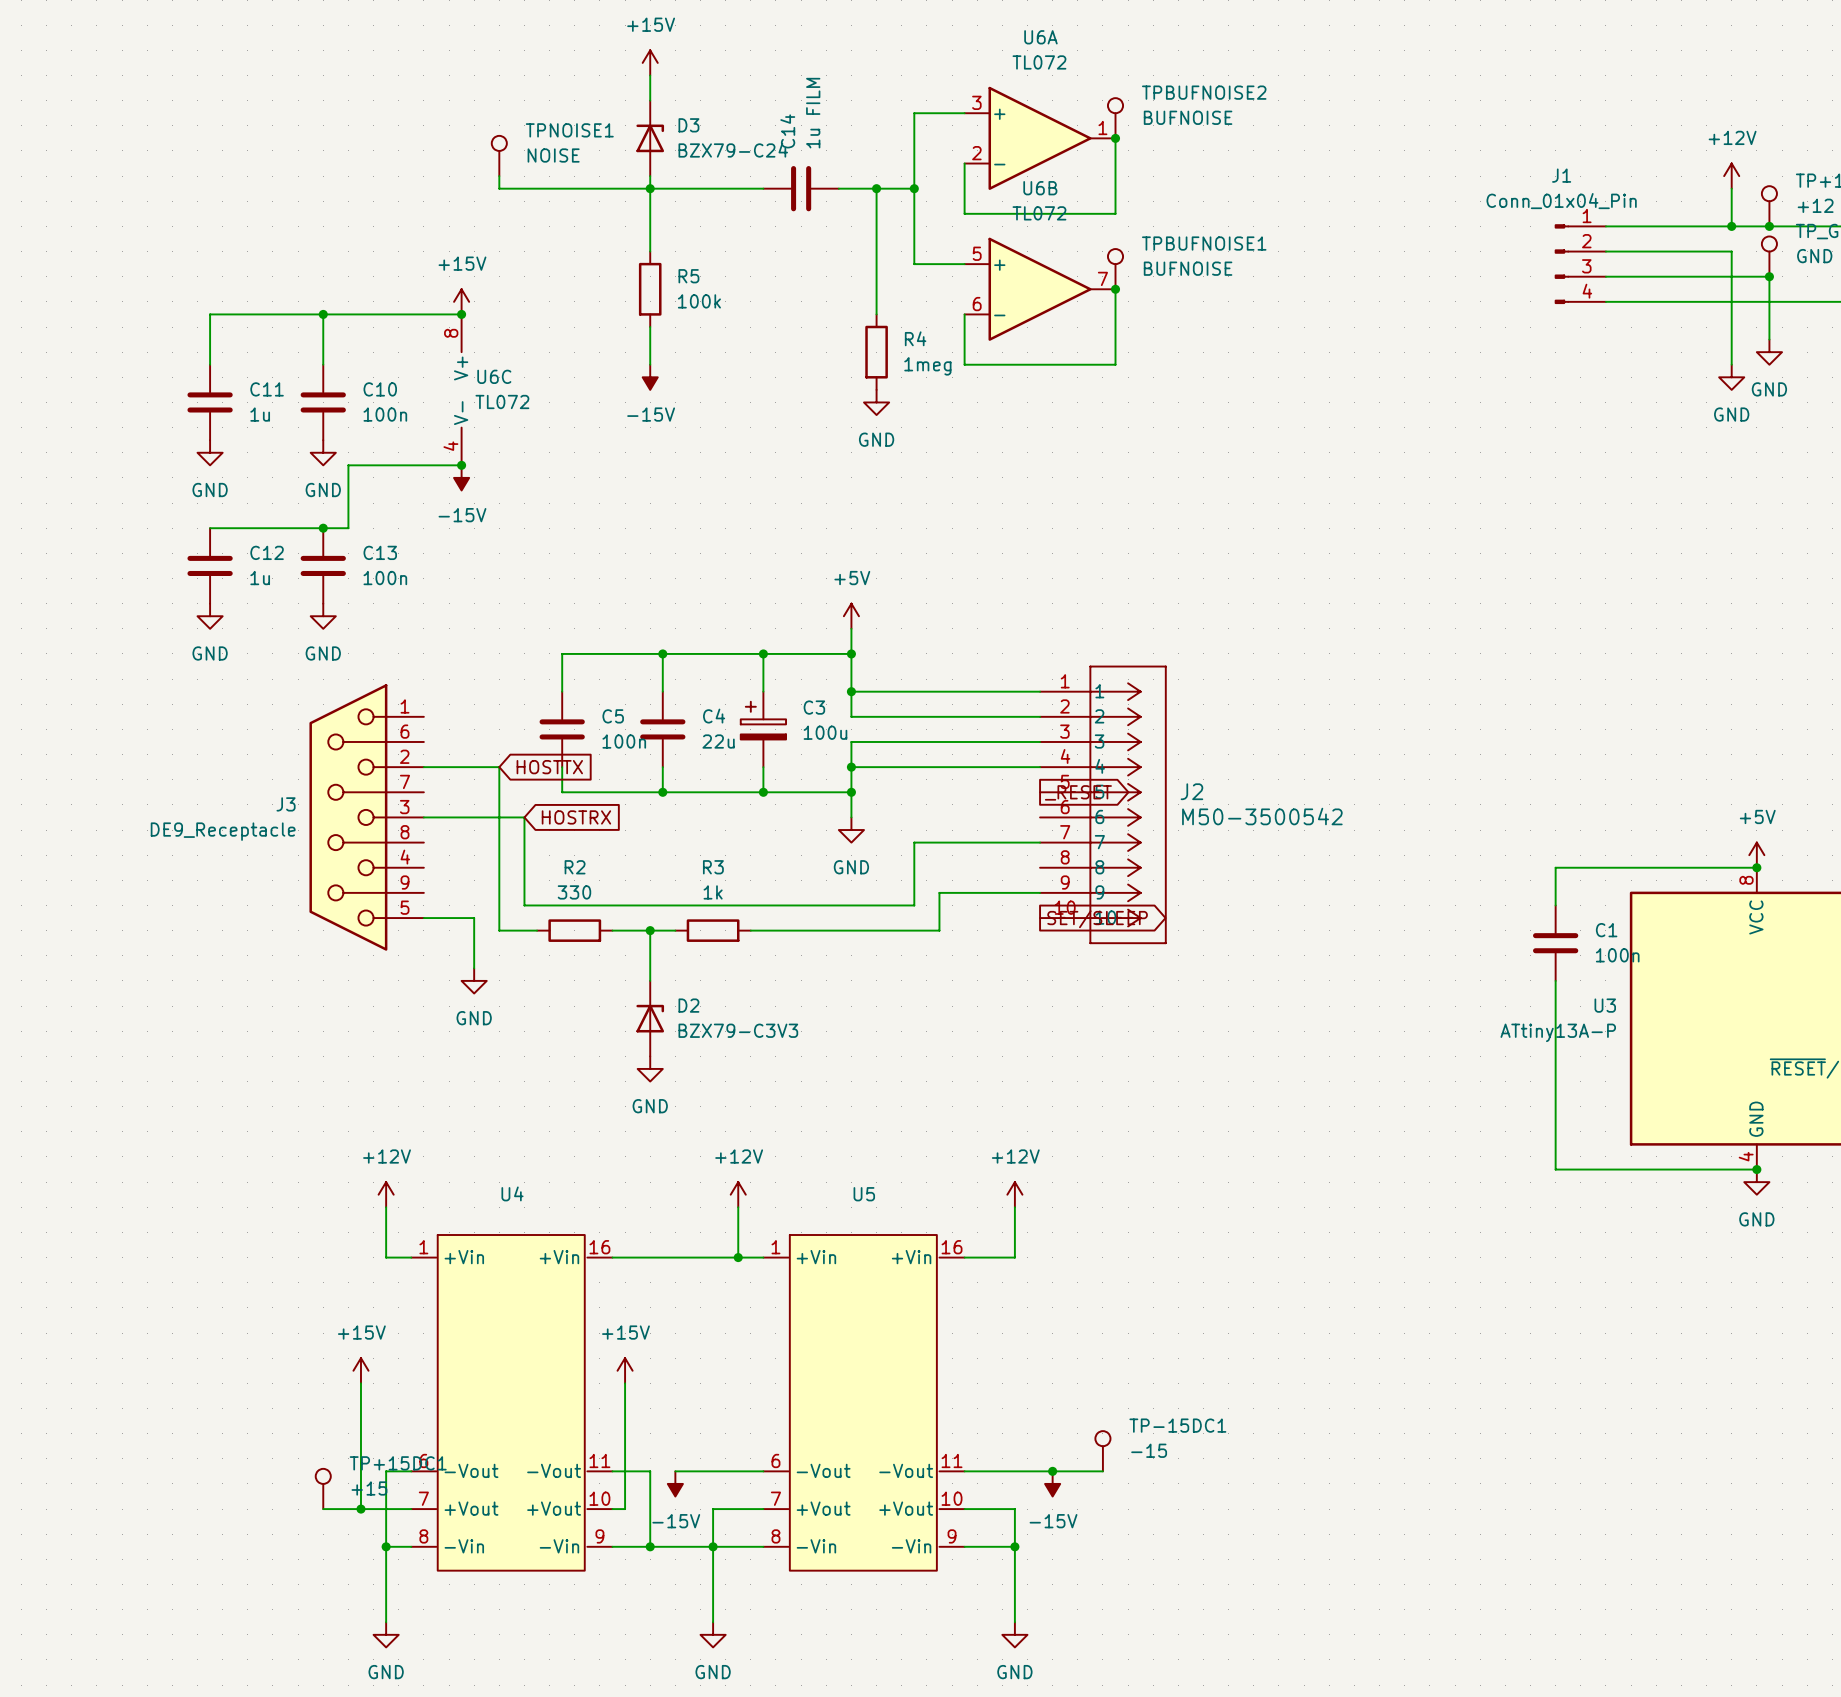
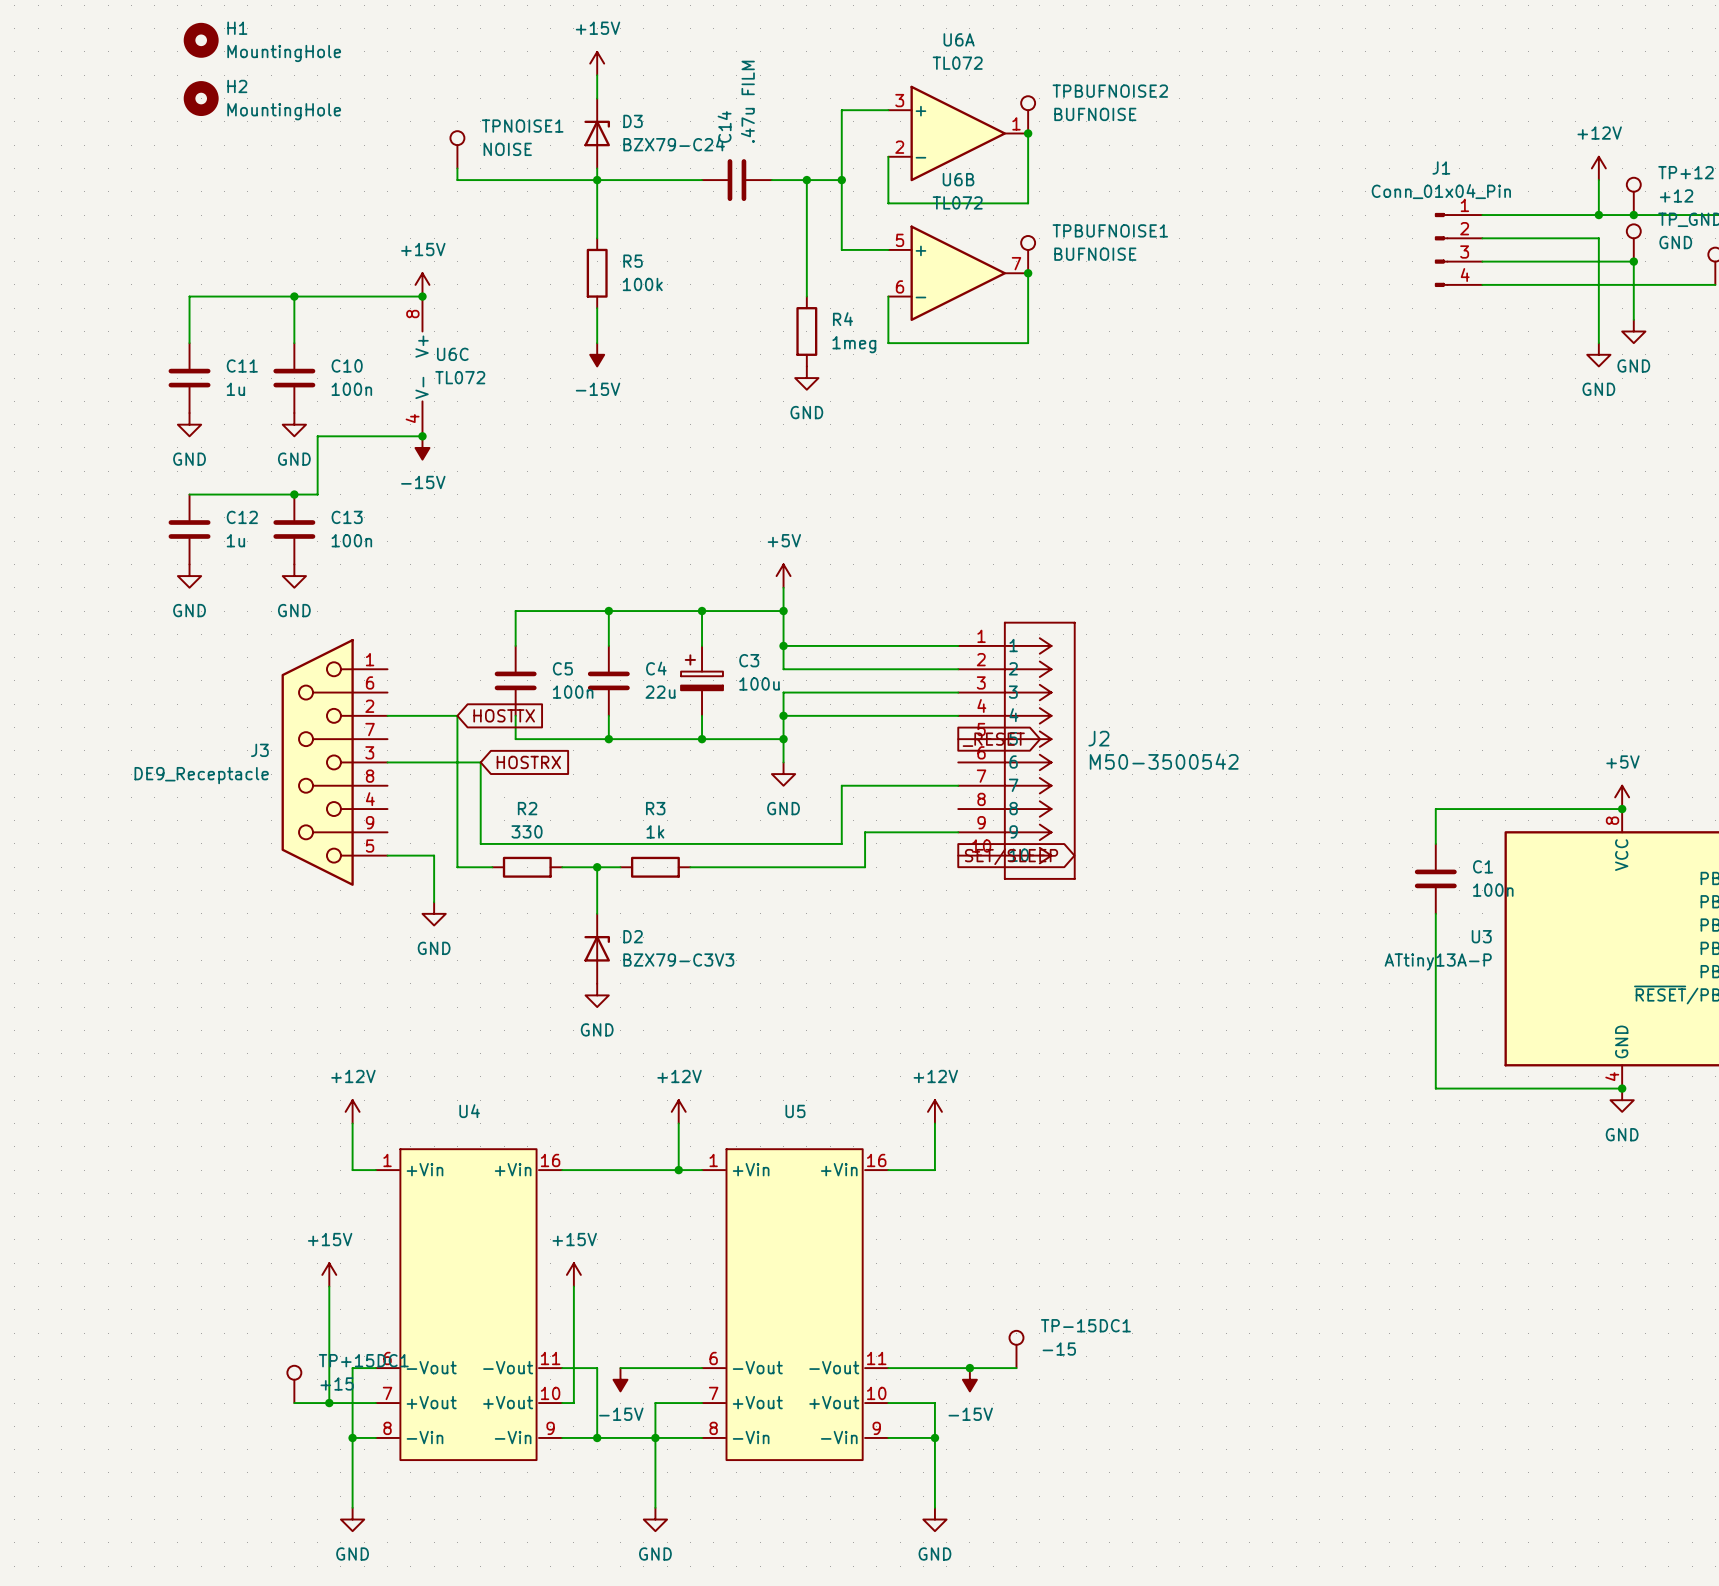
H1: none -> MountingHole (201, 40)
H2: none -> MountingHole (201, 98)
C14 value: 1u FILM (813, 113) -> .47u FILM (747, 101)

